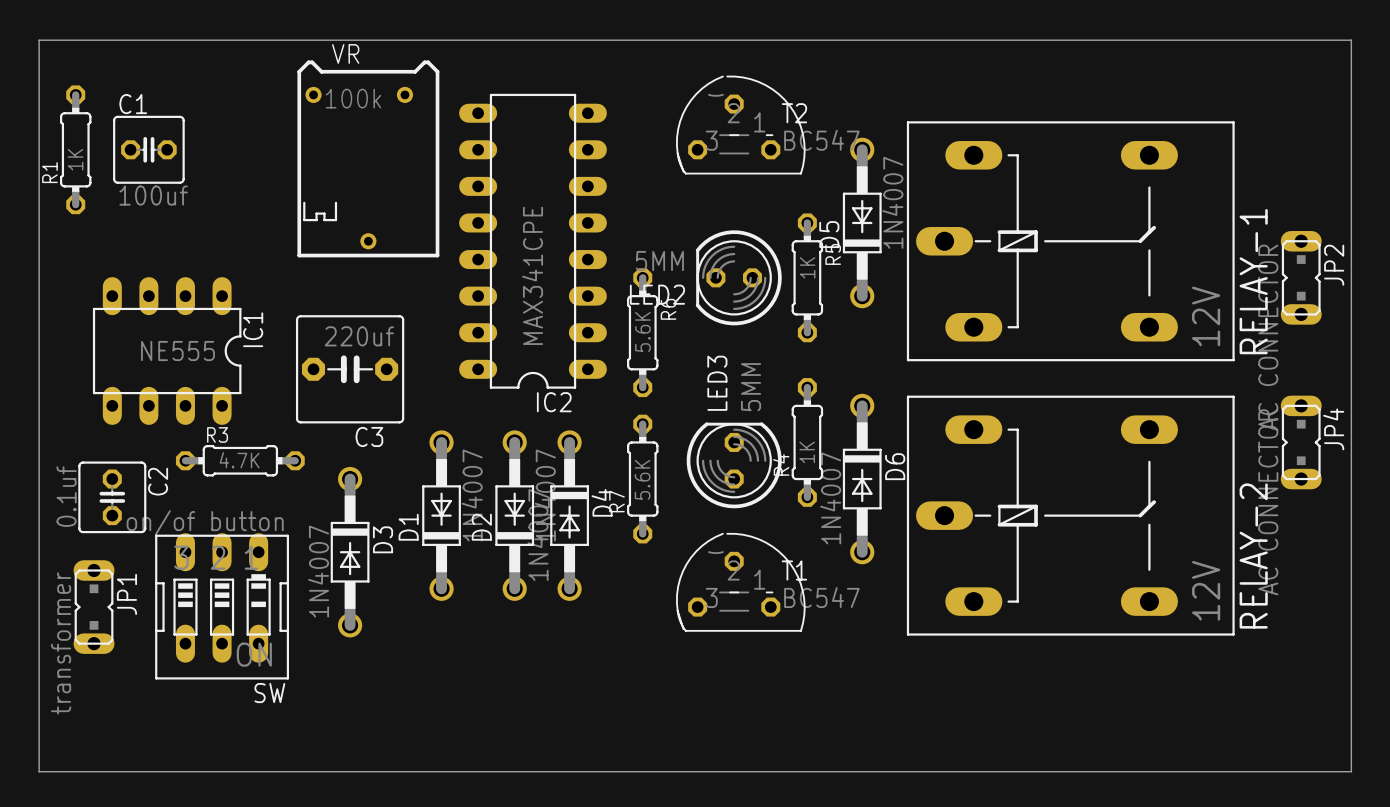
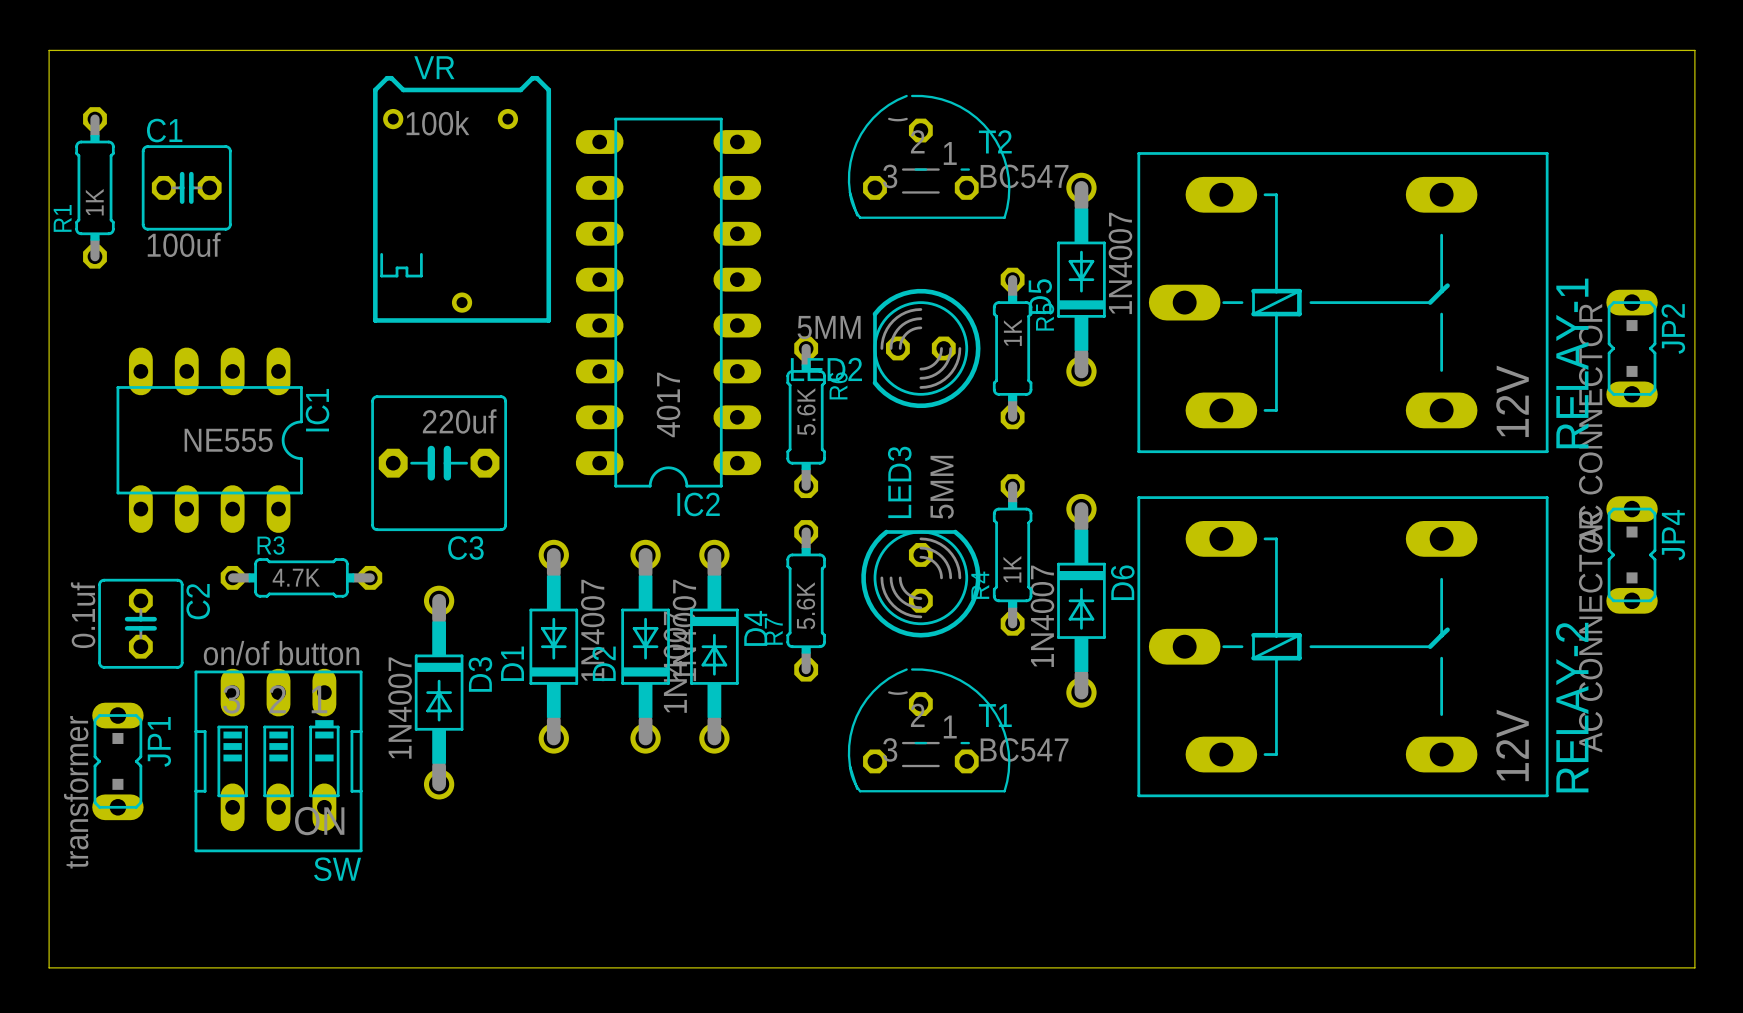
IC2 value: MAX341CPE (532, 275) -> 4017 (668, 404)

